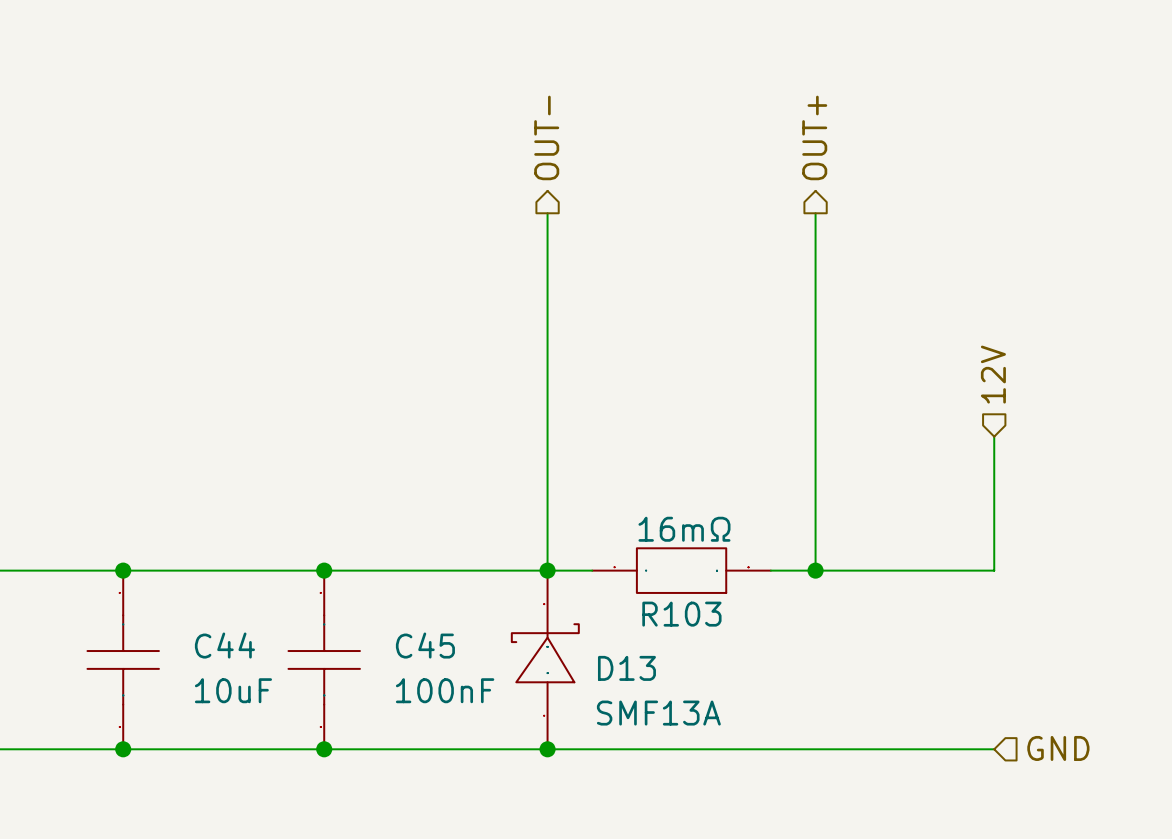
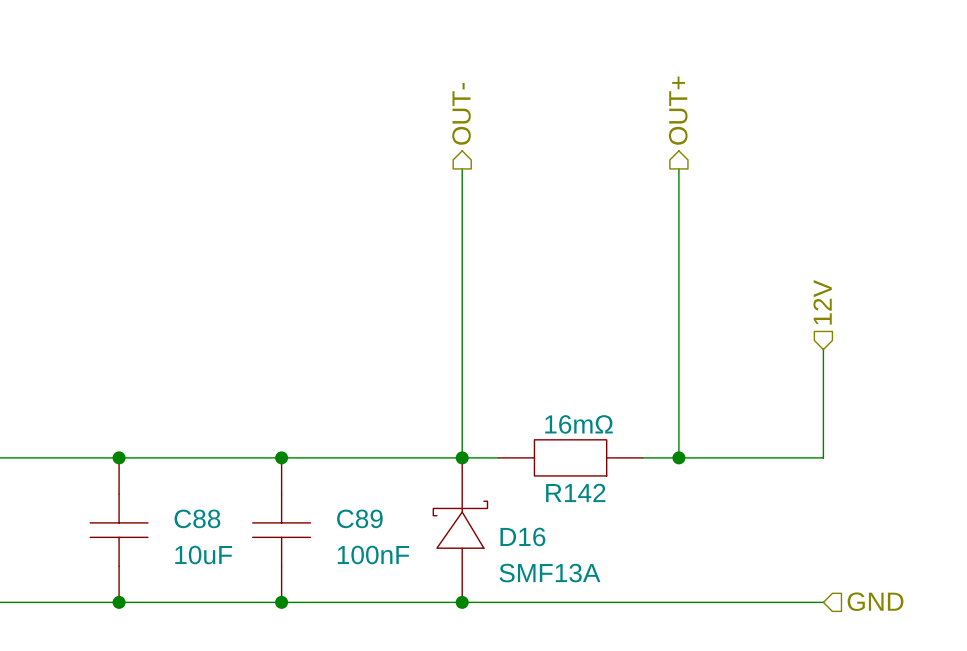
R103 name: R103 (681, 614) -> R142 (575, 492)
C44 name: C44 (224, 645) -> C88 (197, 518)
C45 name: C45 (425, 645) -> C89 (359, 518)
D13 name: D13 (626, 668) -> D16 (522, 536)

